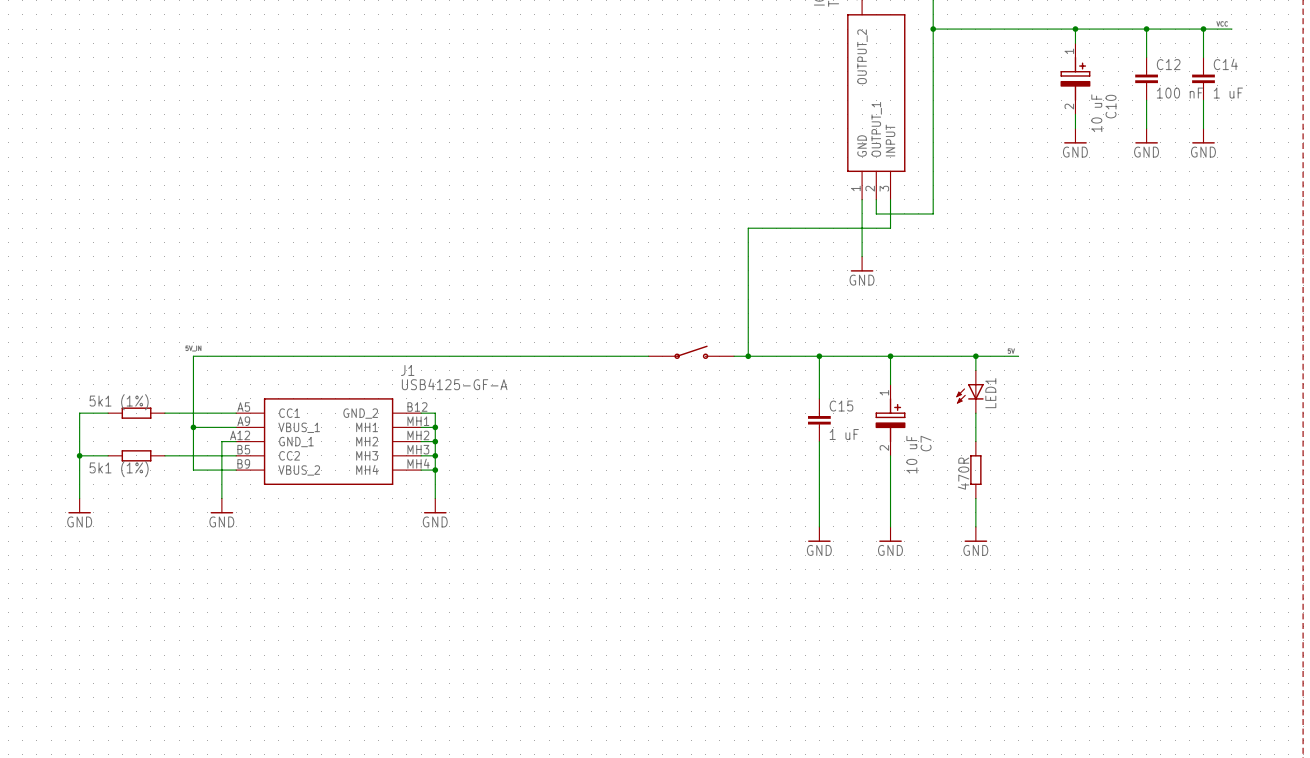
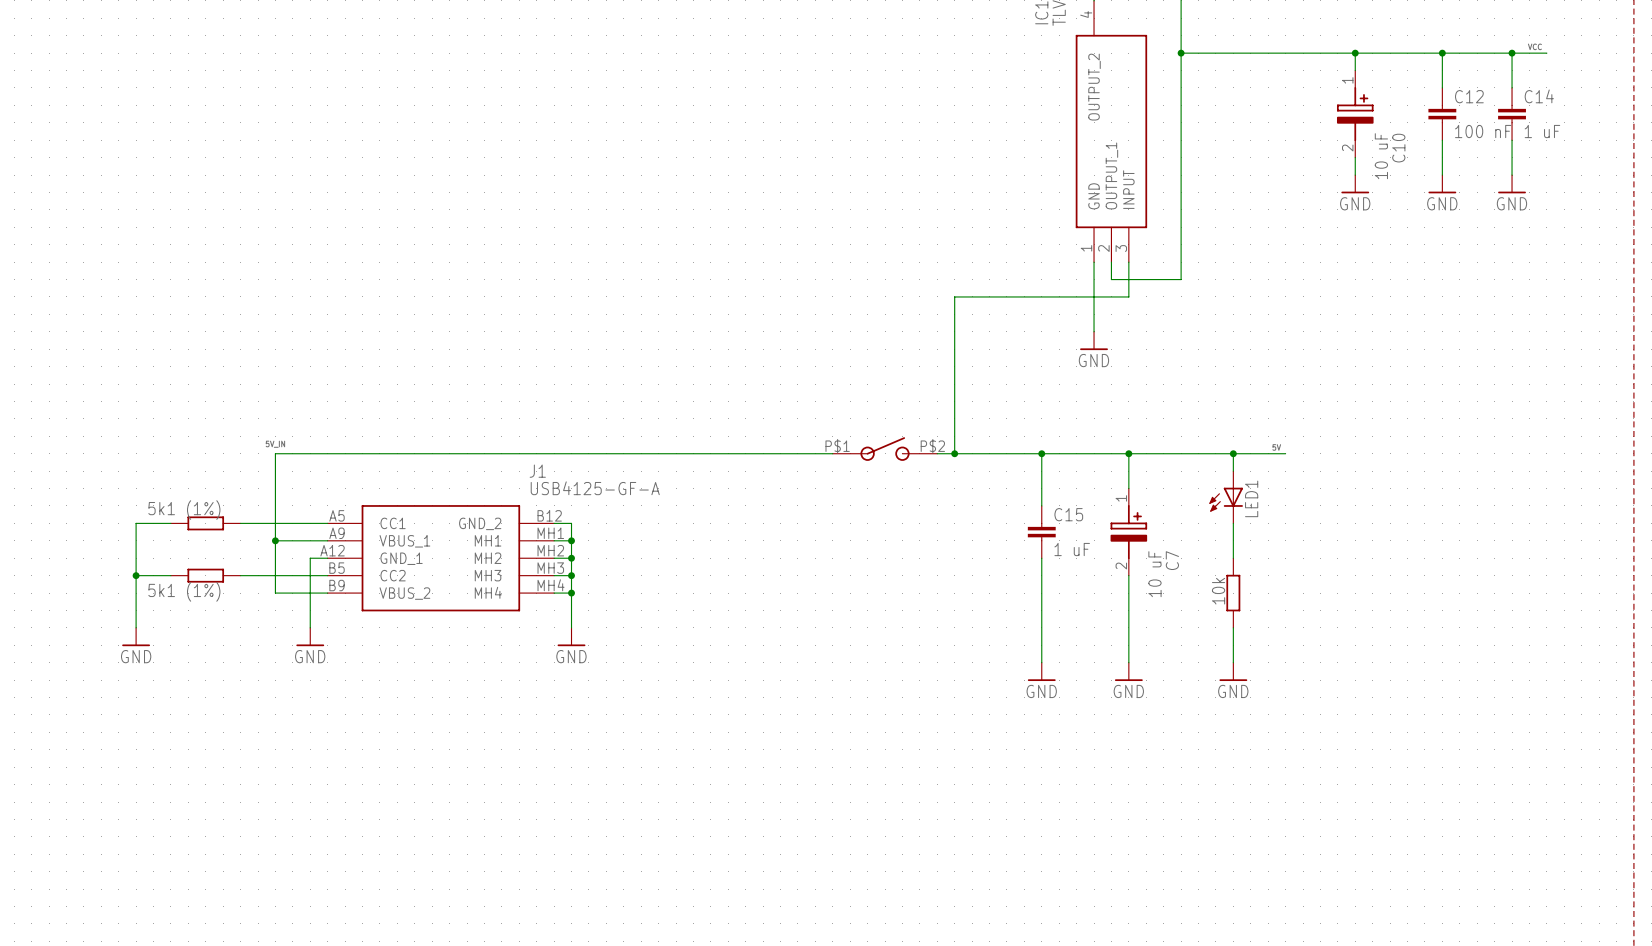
part symbol: [648, 345, 735, 359] -> [832, 437, 938, 461]
part value: 470R (963, 473) -> 10k (1218, 591)

